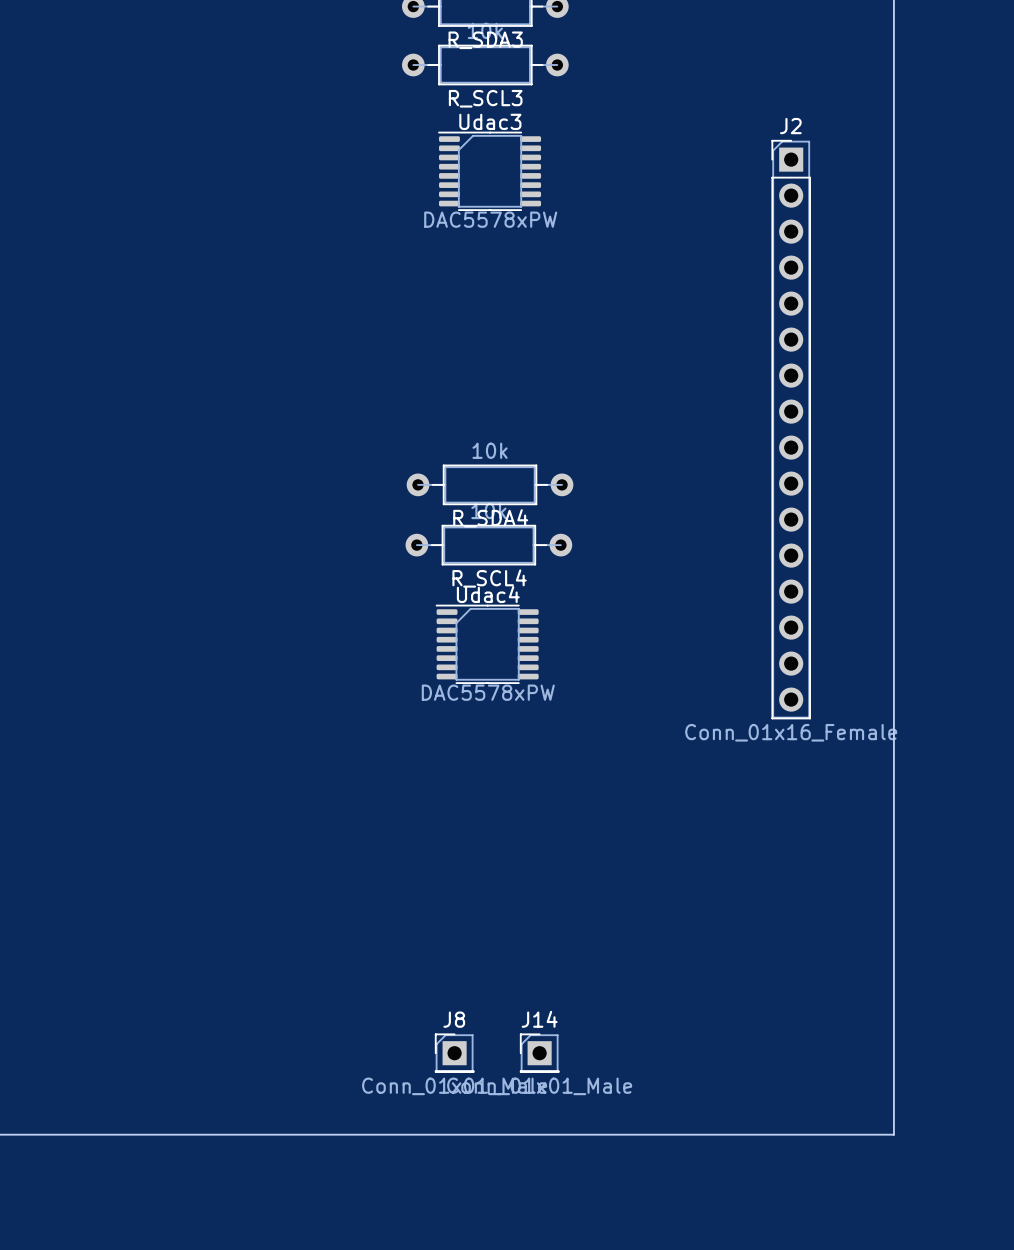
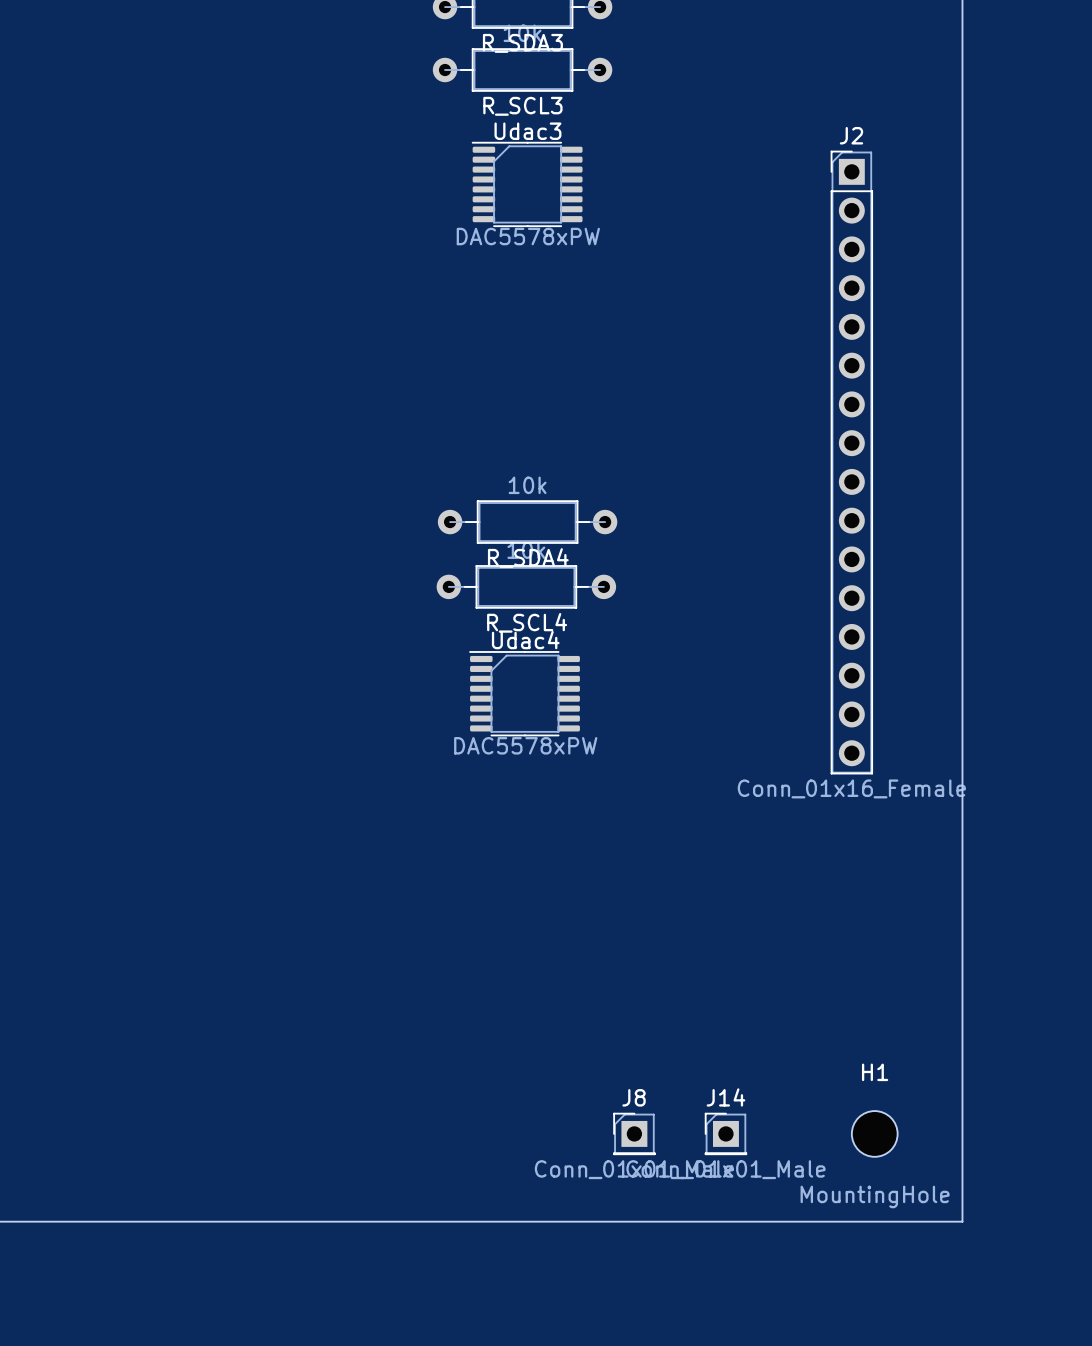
J8 position: (454, 1053) -> (634, 1133)
J14 position: (539, 1053) -> (725, 1133)
H1: none -> MountingHole (874, 1133)

